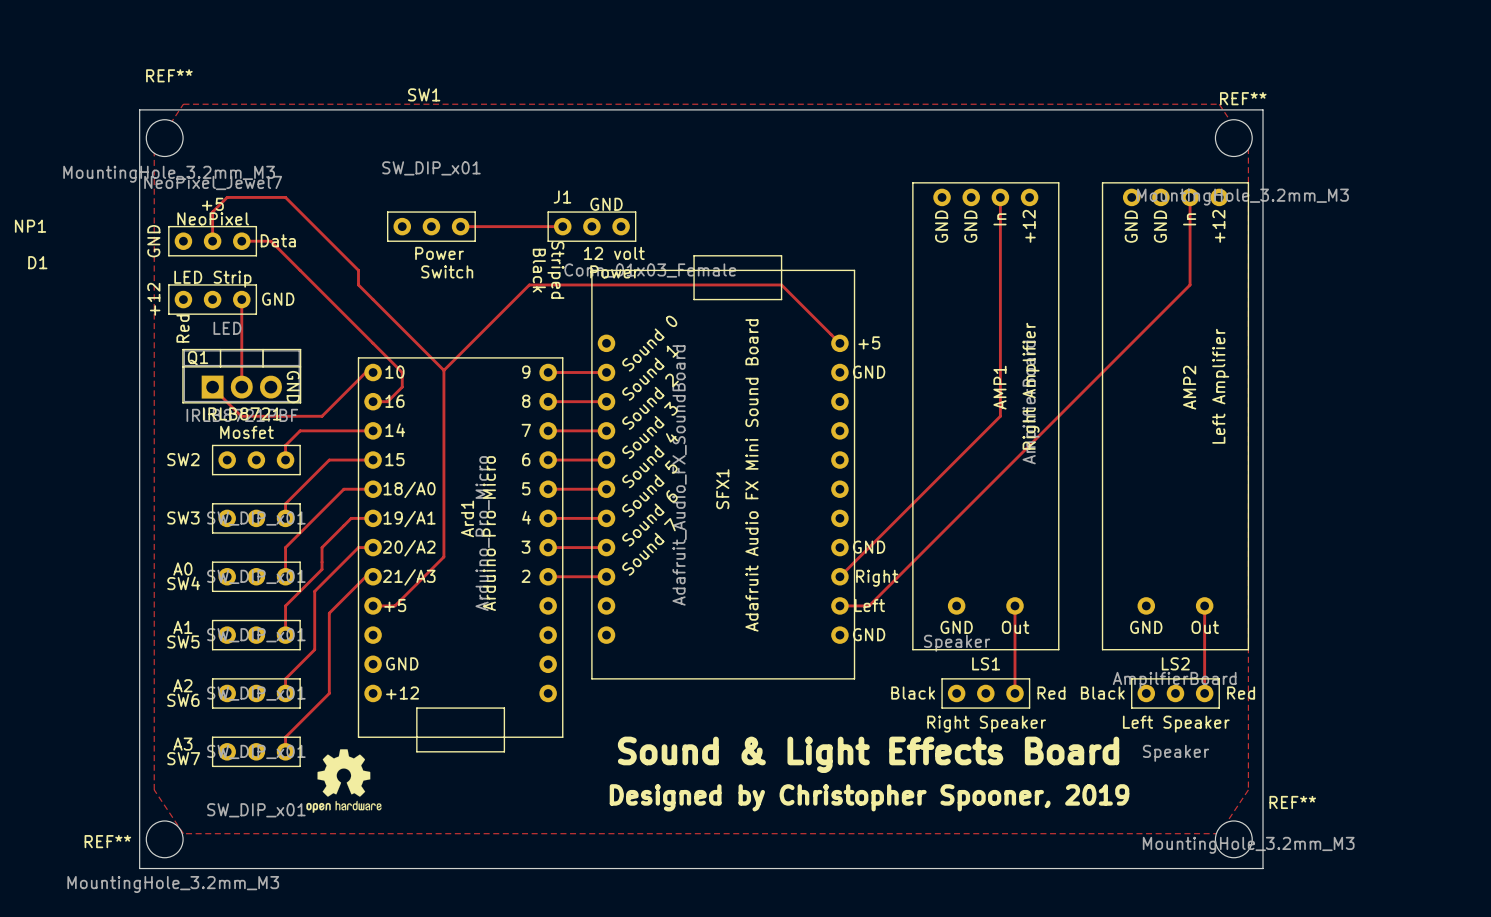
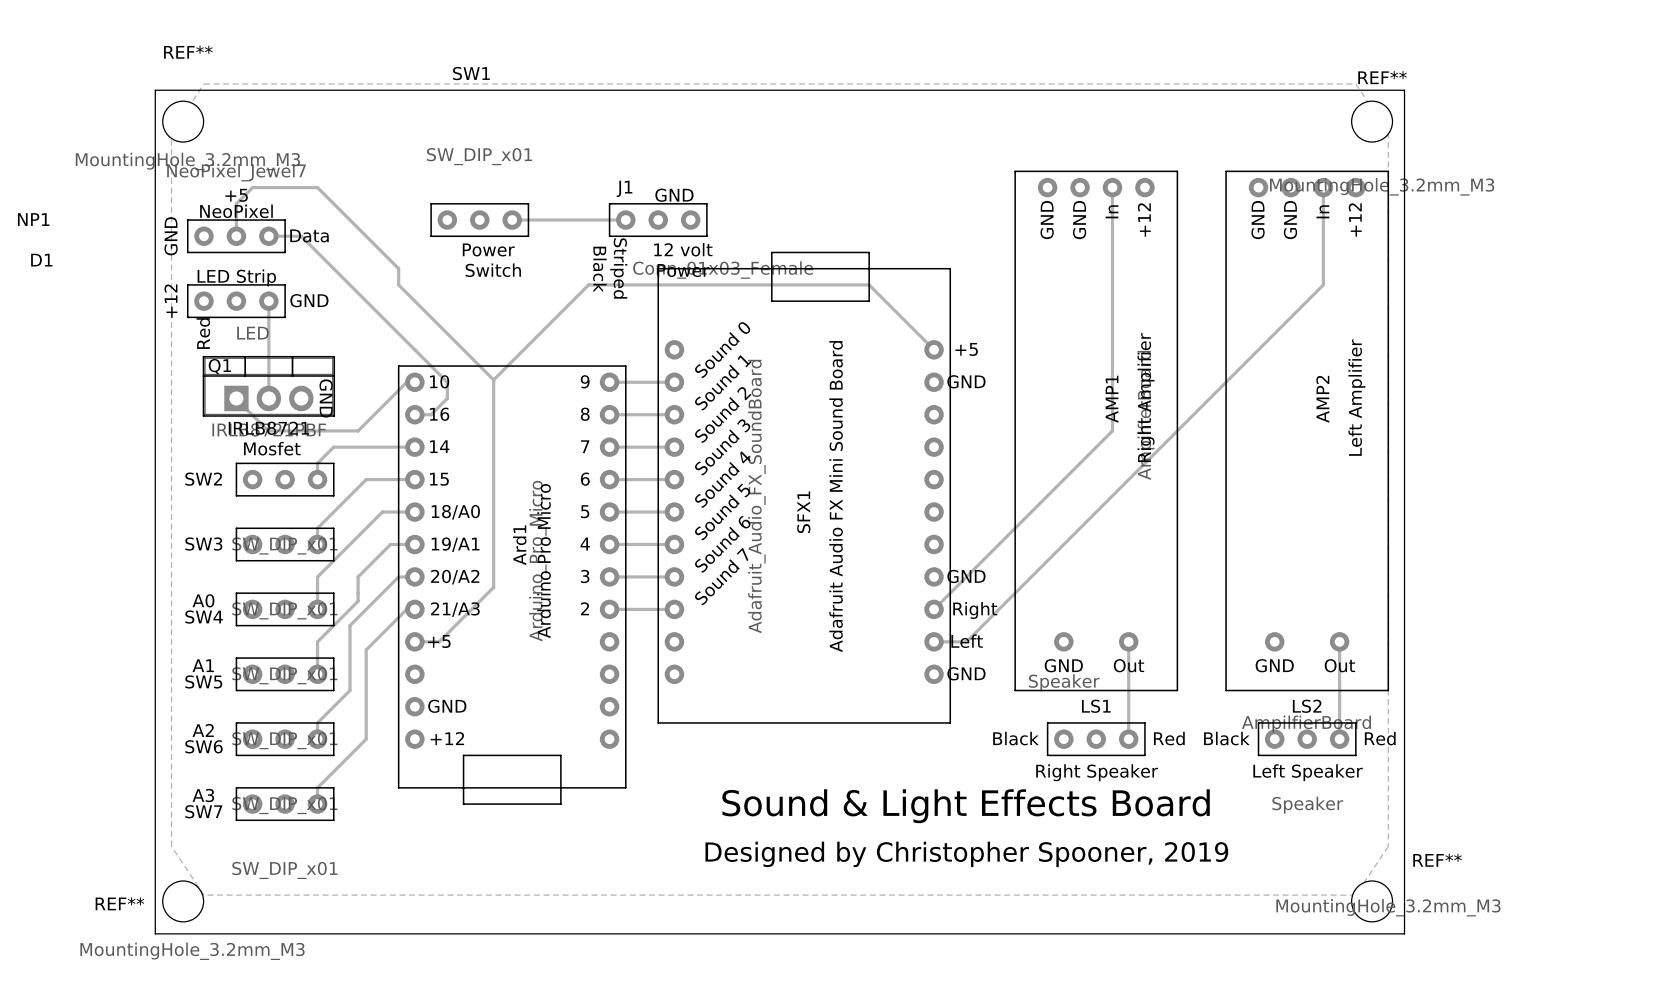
drawing: [306, 749, 382, 813] -> none

